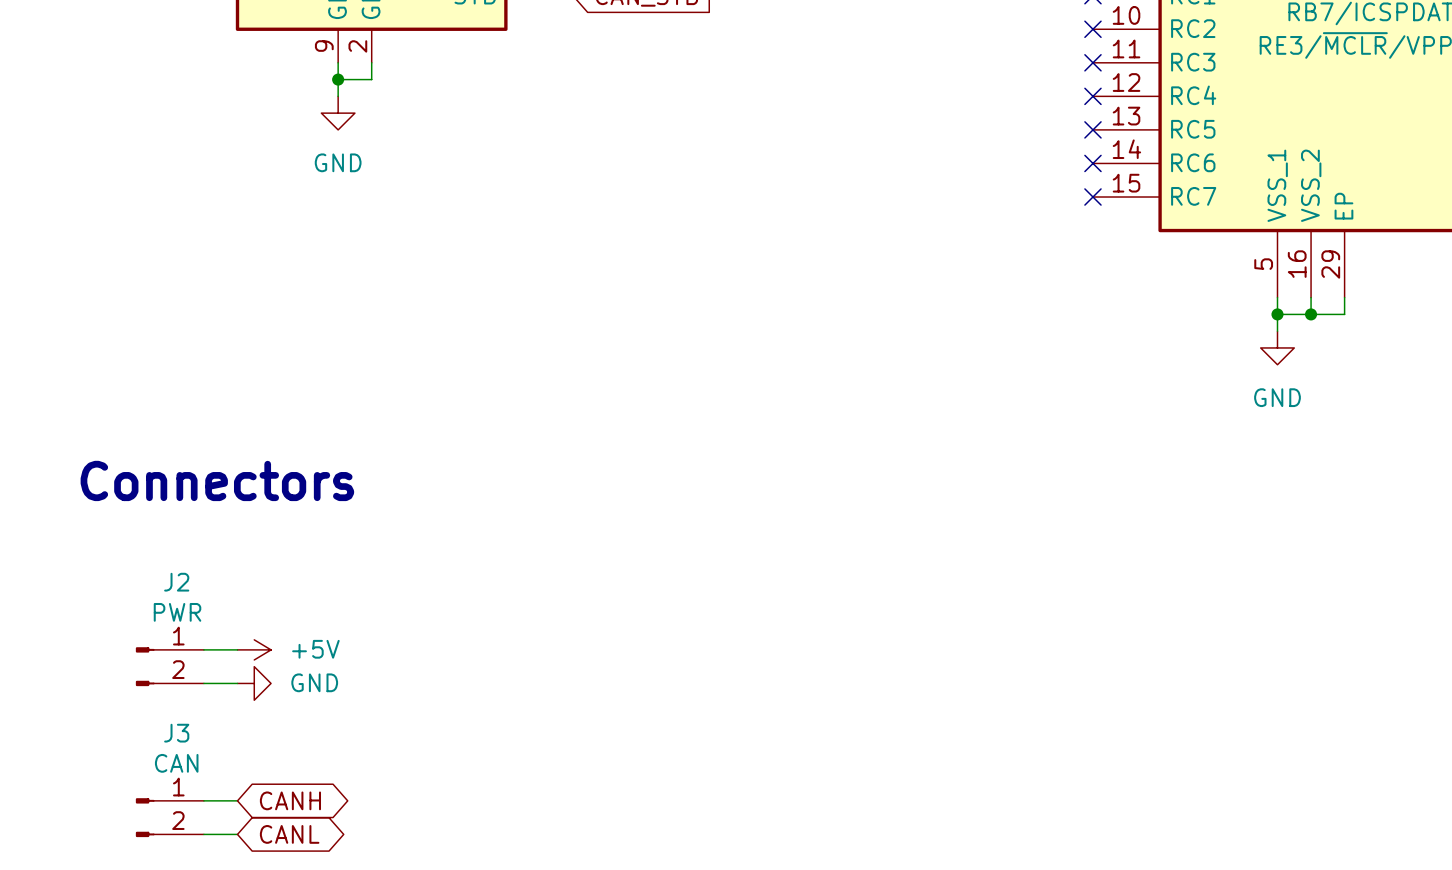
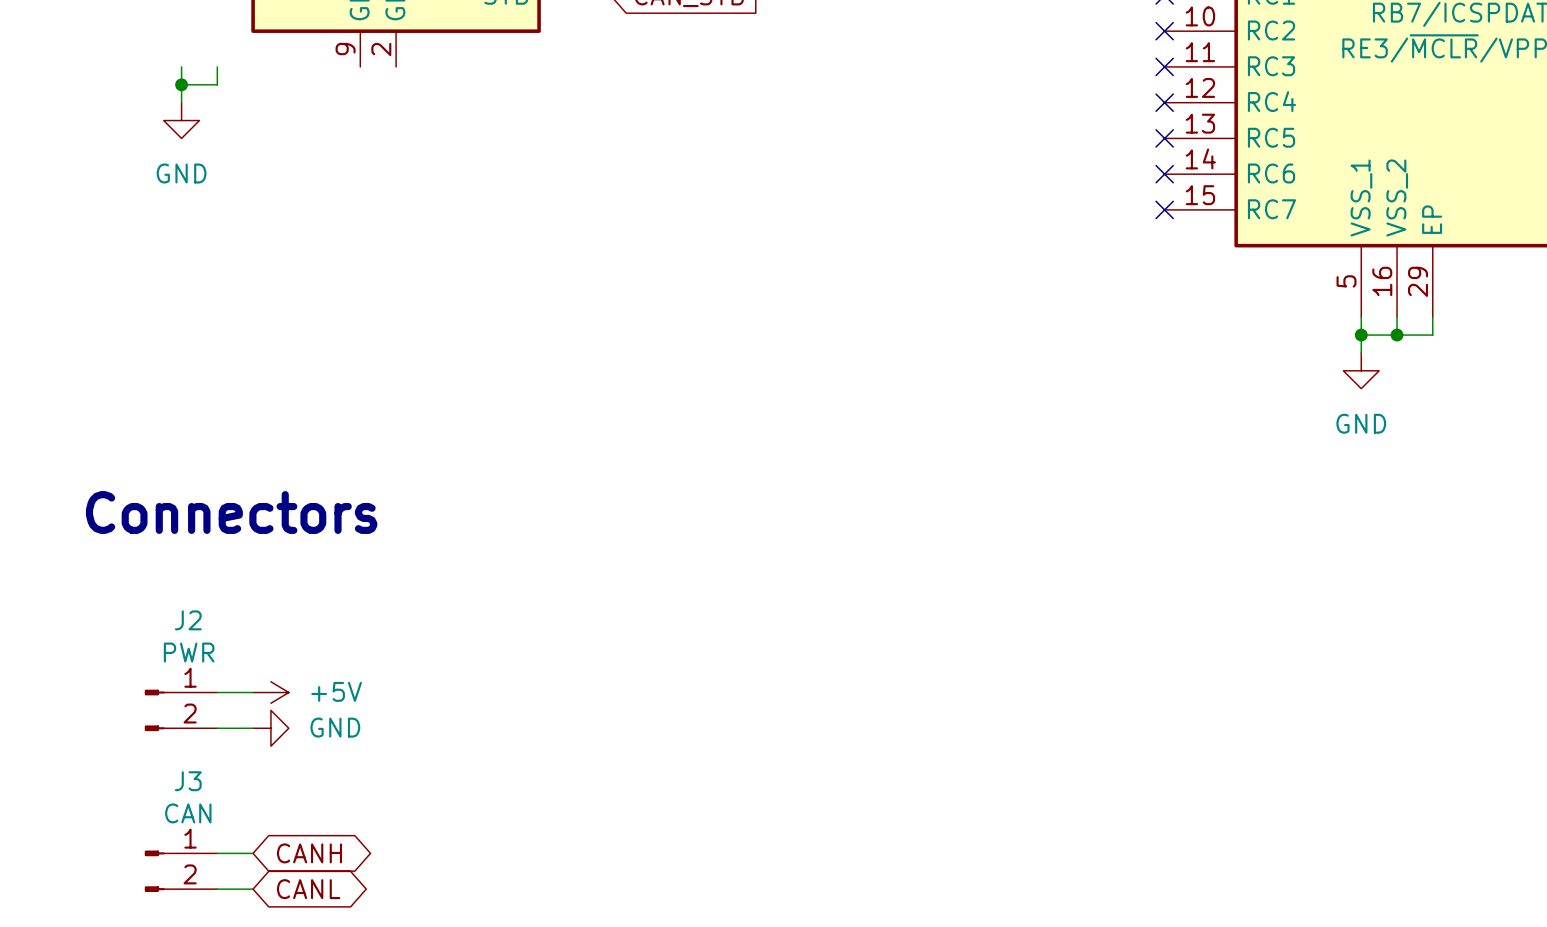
wire: (338, 62) (338, 96) -> (181, 66) (181, 102)
wire: (371, 62) (371, 79) (338, 79) -> (217, 66) (217, 84) (181, 84)
junction: none -> (181, 84)
junction: (338, 79) -> none
power symbol position: GND (338, 113) -> GND (181, 120)

